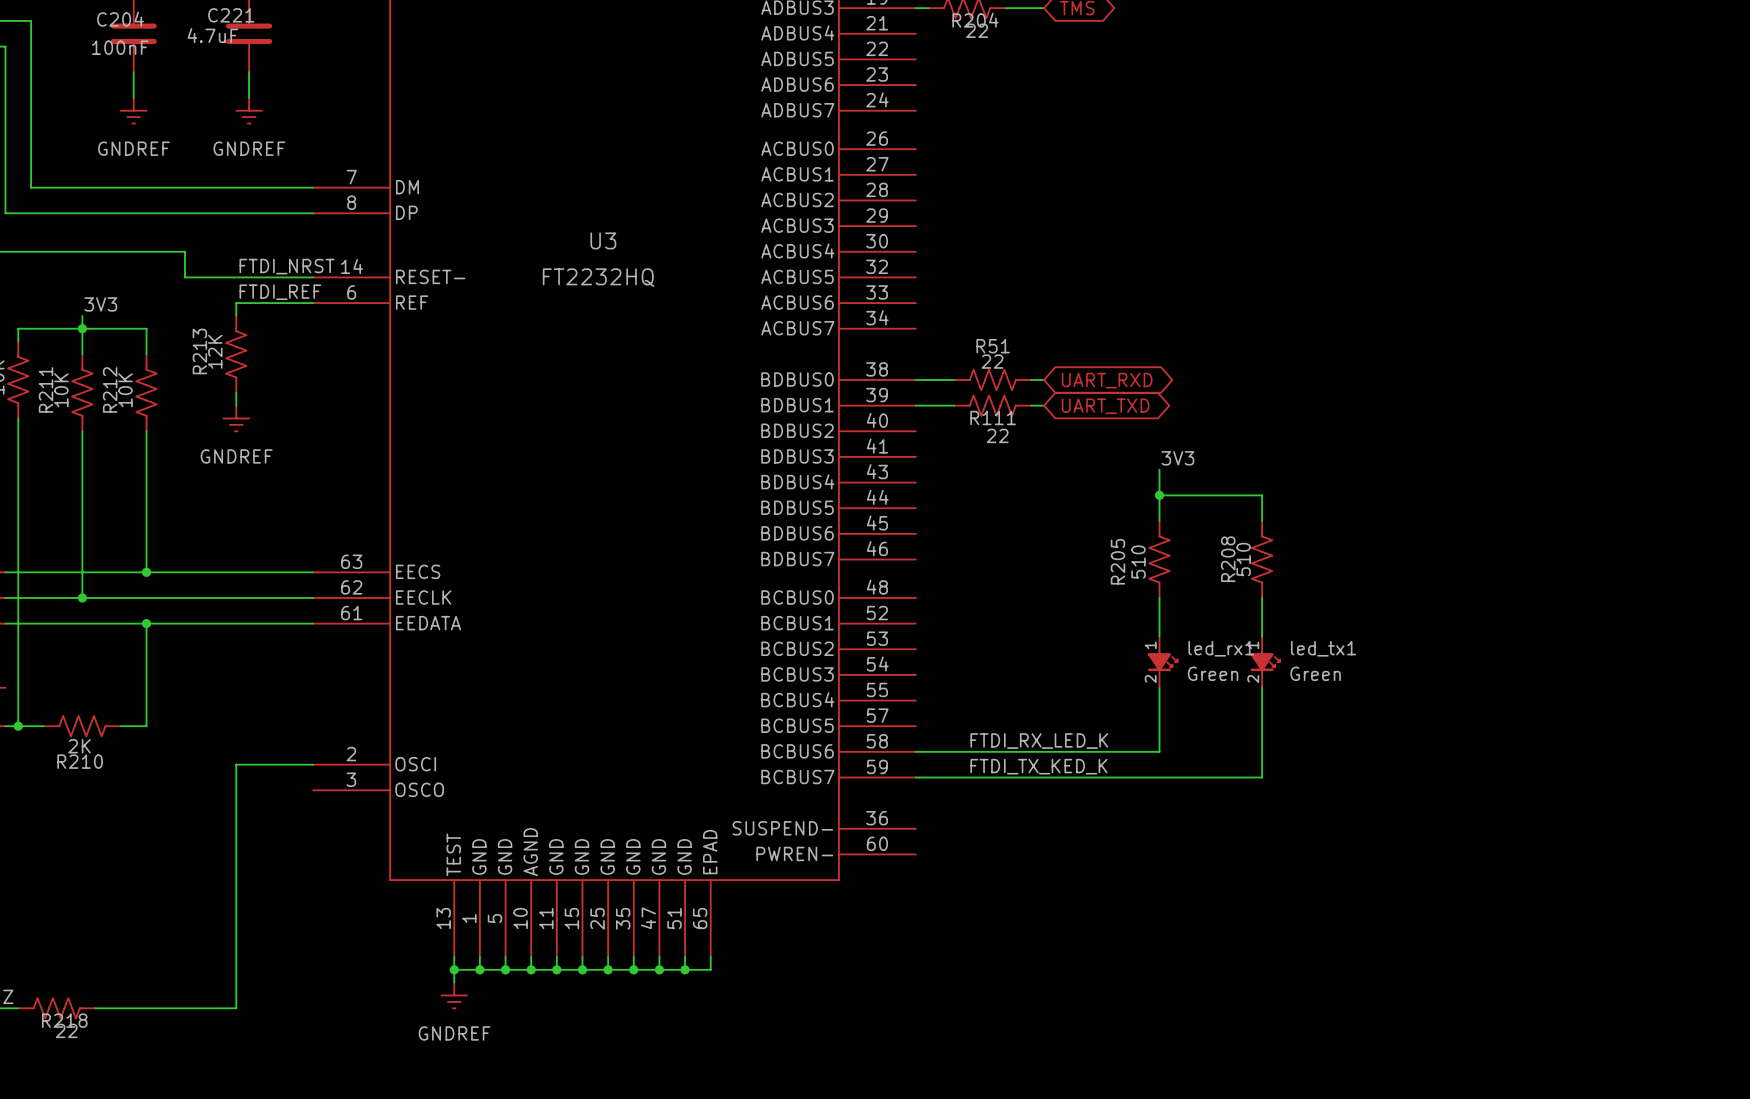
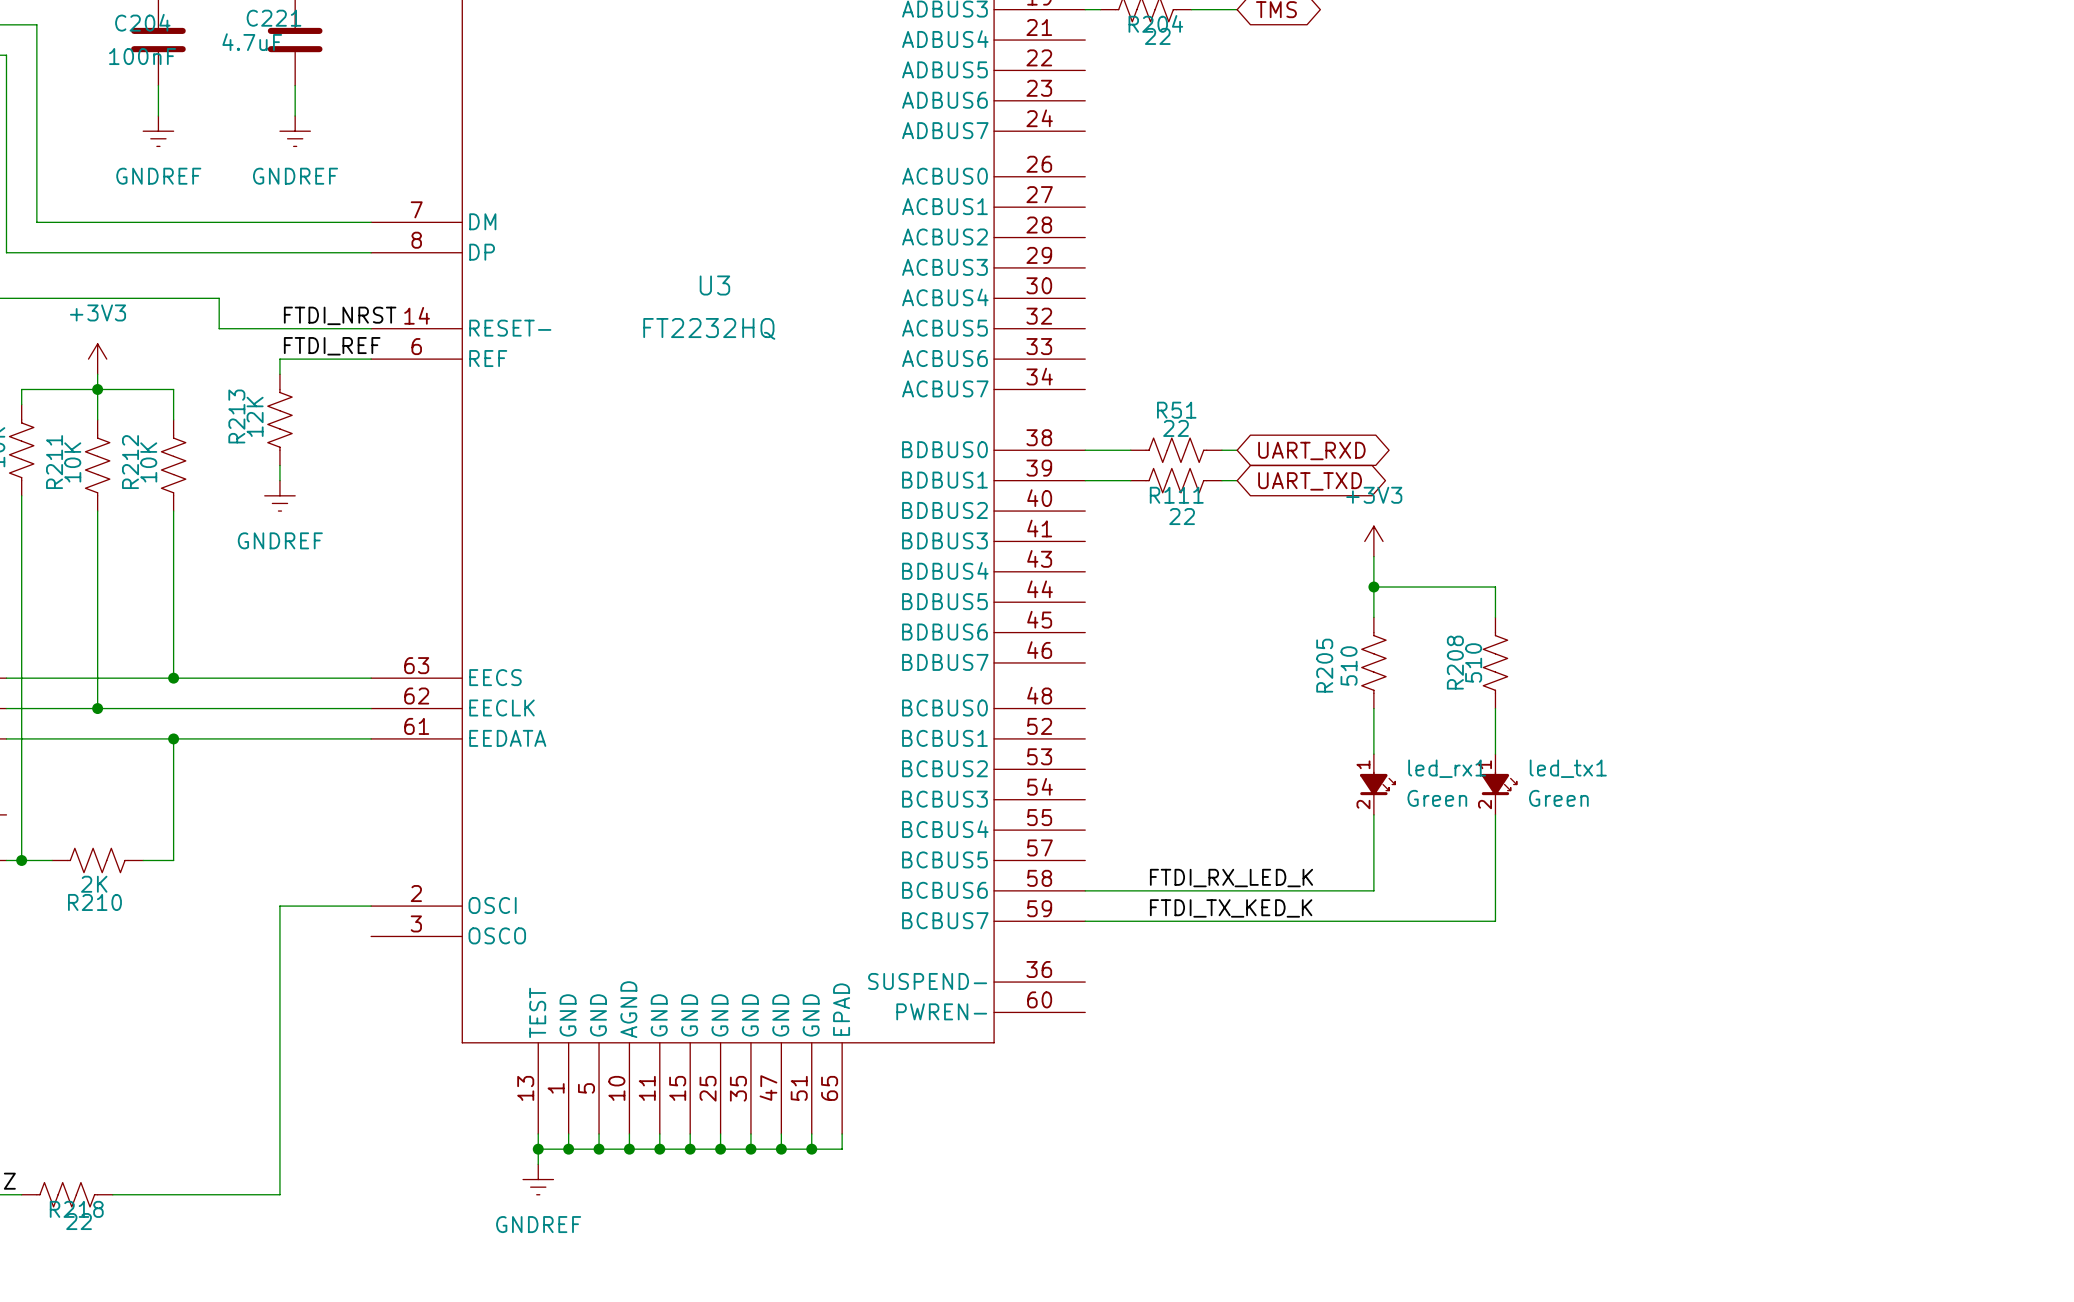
power symbol: none -> +3V3 (97, 359)
label: 3V3 (100, 304) -> none
power symbol: none -> +3V3 (1373, 541)
label: 3V3 (1177, 458) -> none

